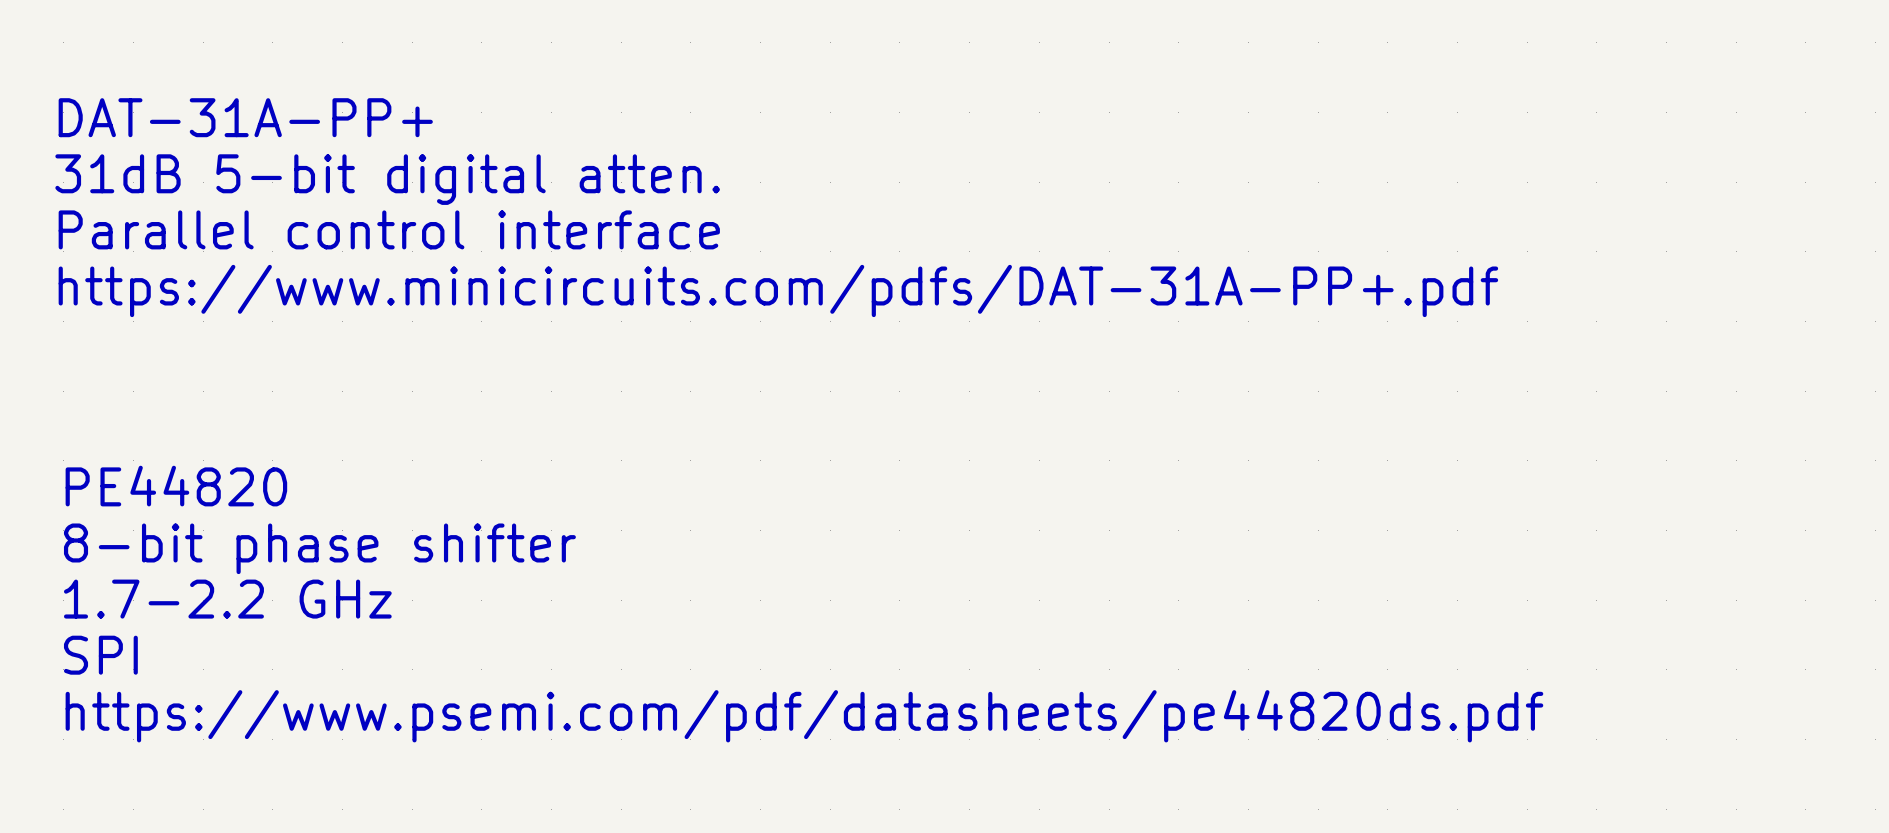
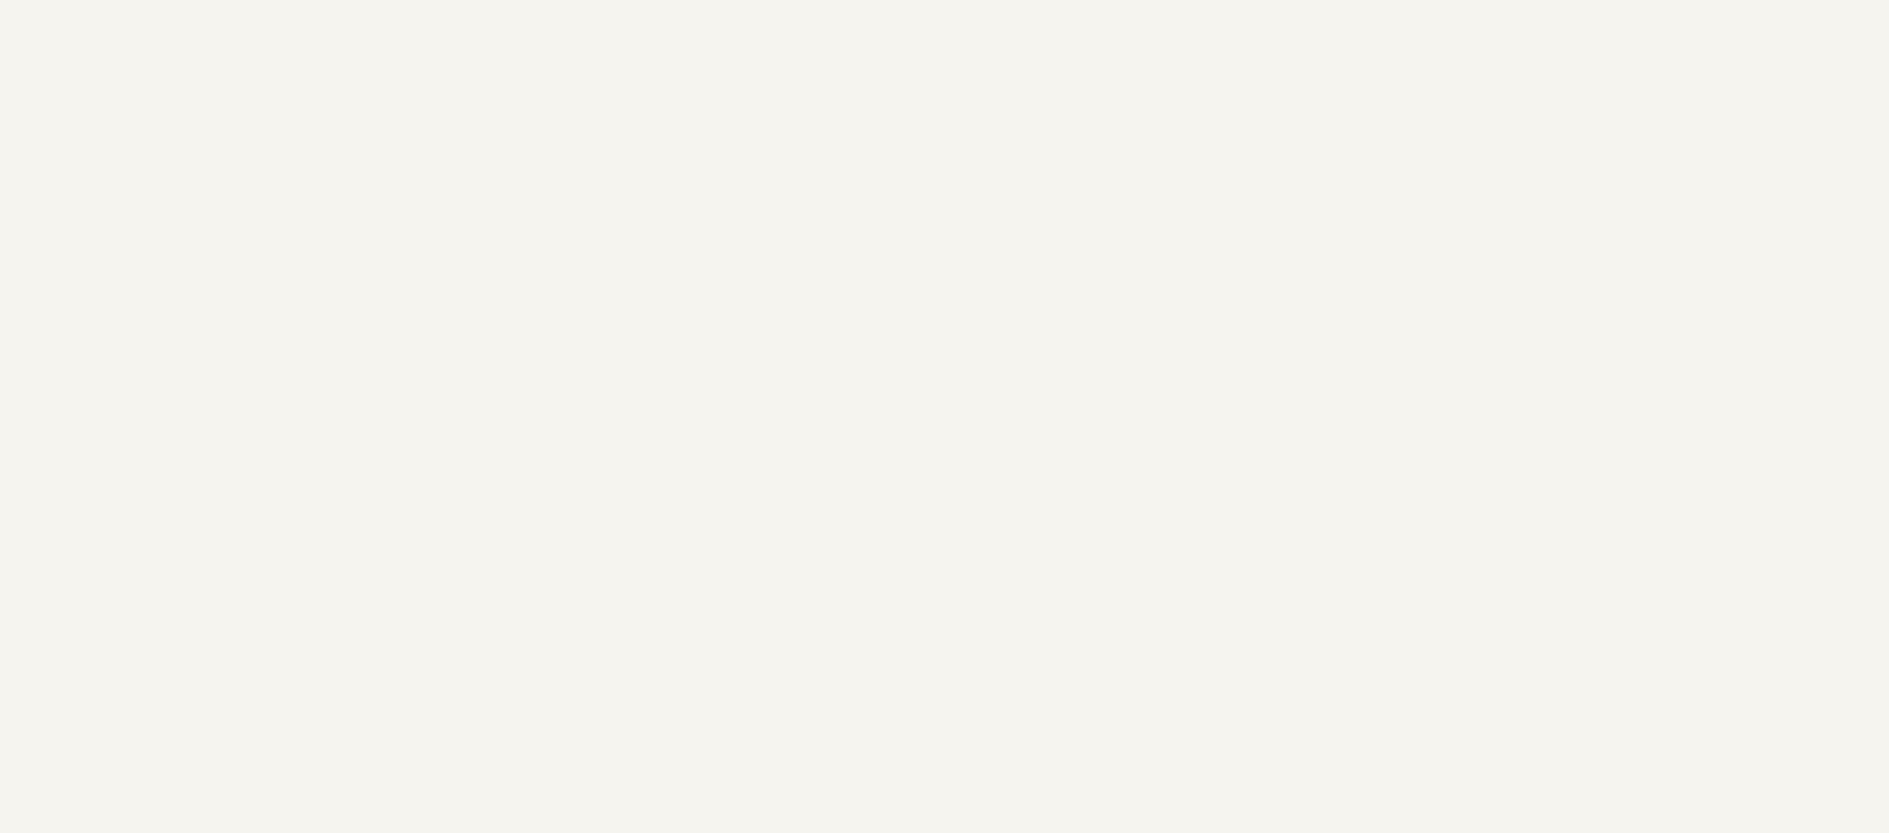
text: DAT-31A-PP+ (245, 117) -> none
text: 31dB 5-bit digital atten. (387, 179) -> none
text: Parallel control interface (389, 229) -> none
text: https://www.minicircuits.com/pdfs/DAT-31A-PP+.pdf (778, 290) -> none
text: PE44820 (176, 486) -> none
text: 8-bit phase shifter (319, 548) -> none
text: 1.7-2.2 GHz (227, 599) -> none
text: SPI (100, 655) -> none
text: https://www.psemi.com/pdf/datasheets/pe44820ds.pdf (804, 716) -> none

